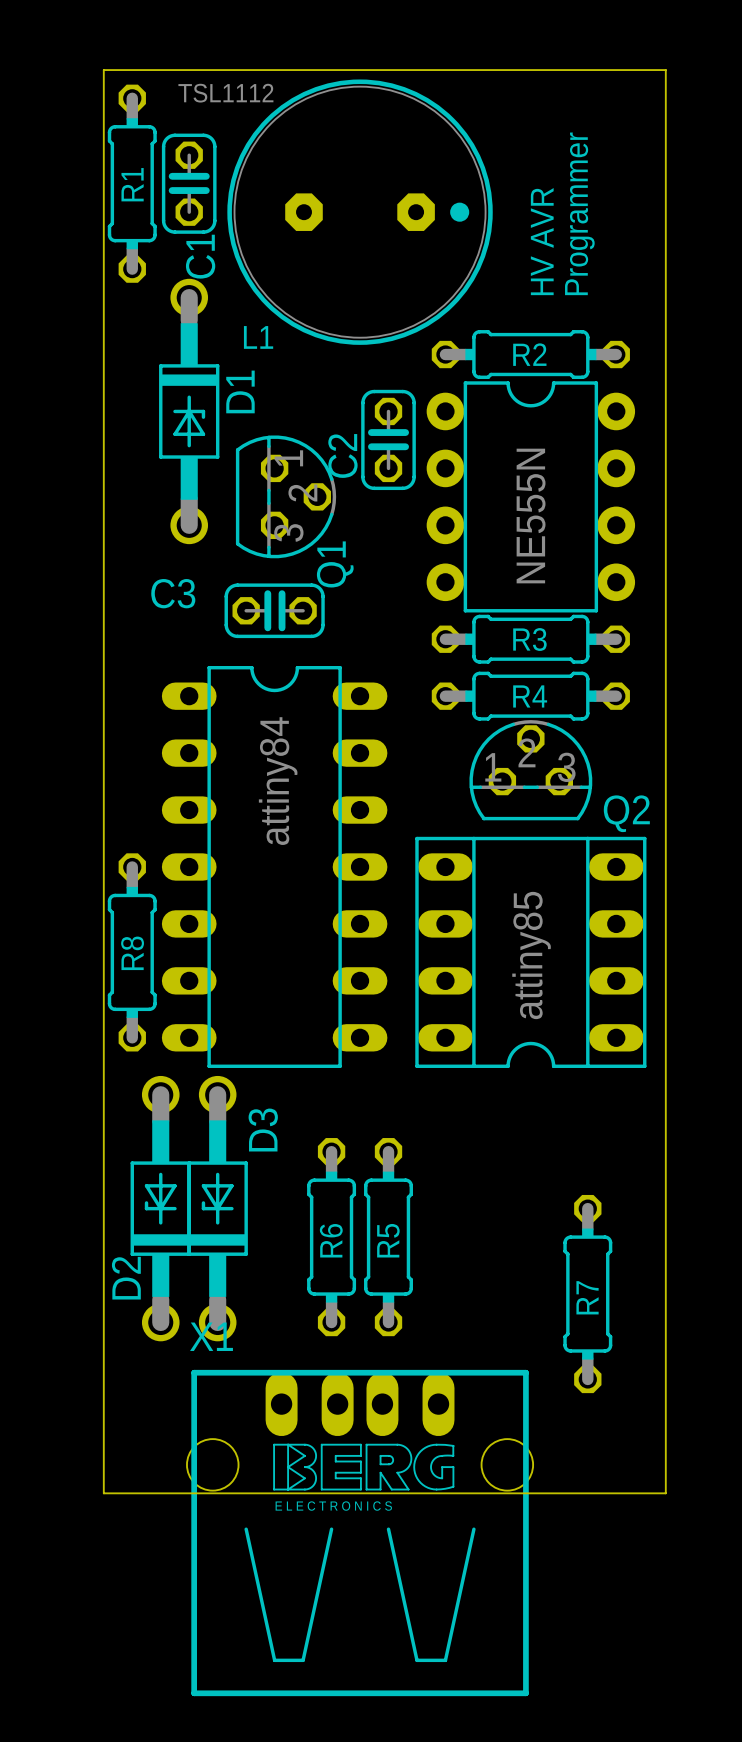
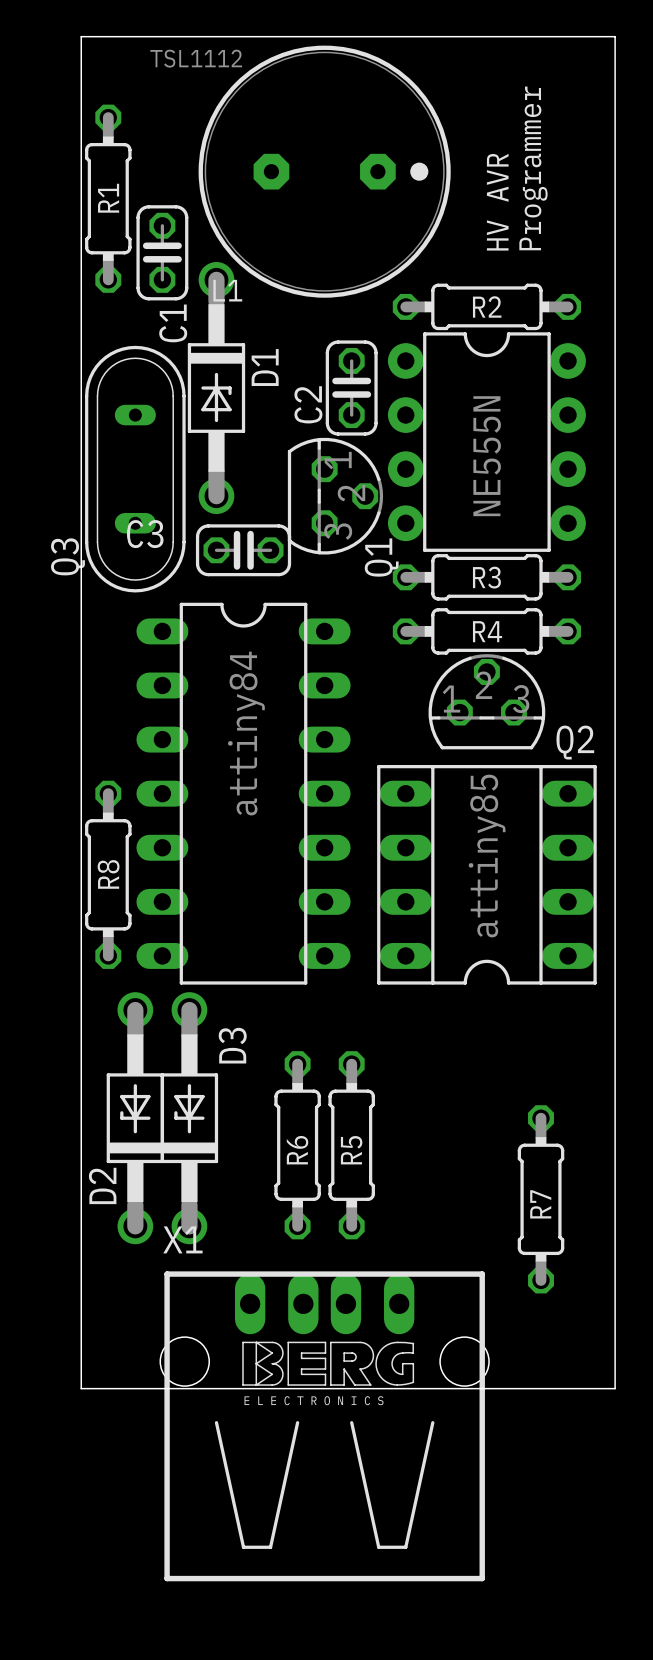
R1 position: (132, 183) -> (108, 198)
C1 position: (189, 183) -> (162, 252)
D1 position: (189, 411) -> (216, 388)
Q1 position: (286, 496) -> (335, 496)
Q3: none -> (135, 469)

